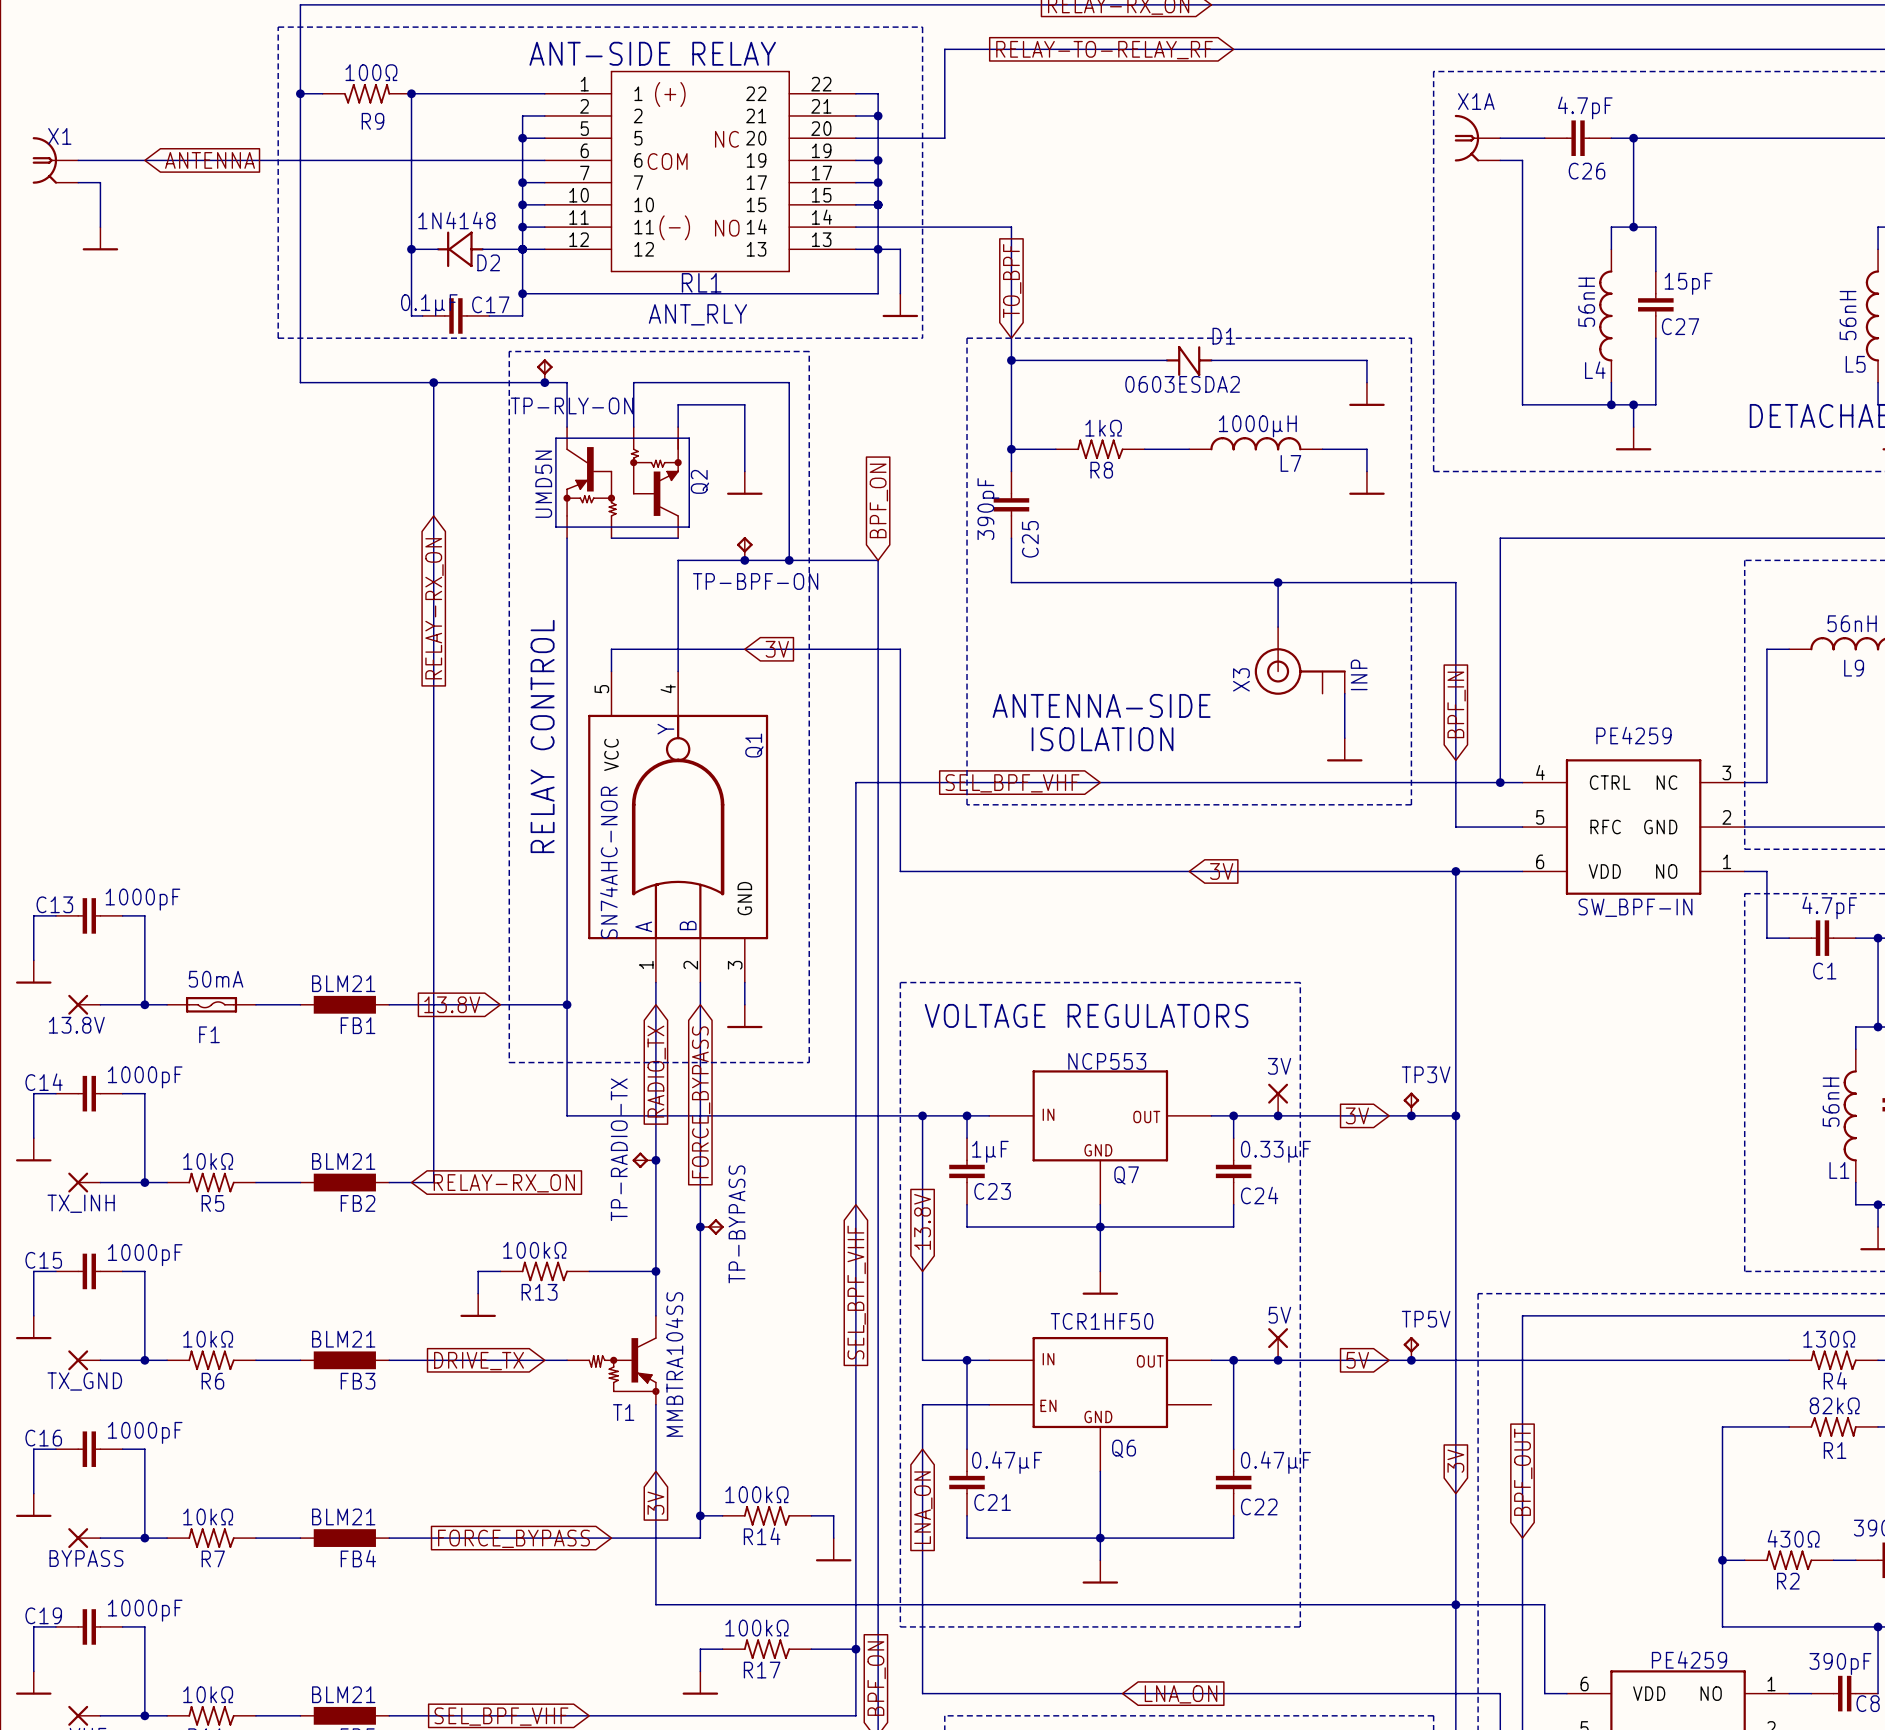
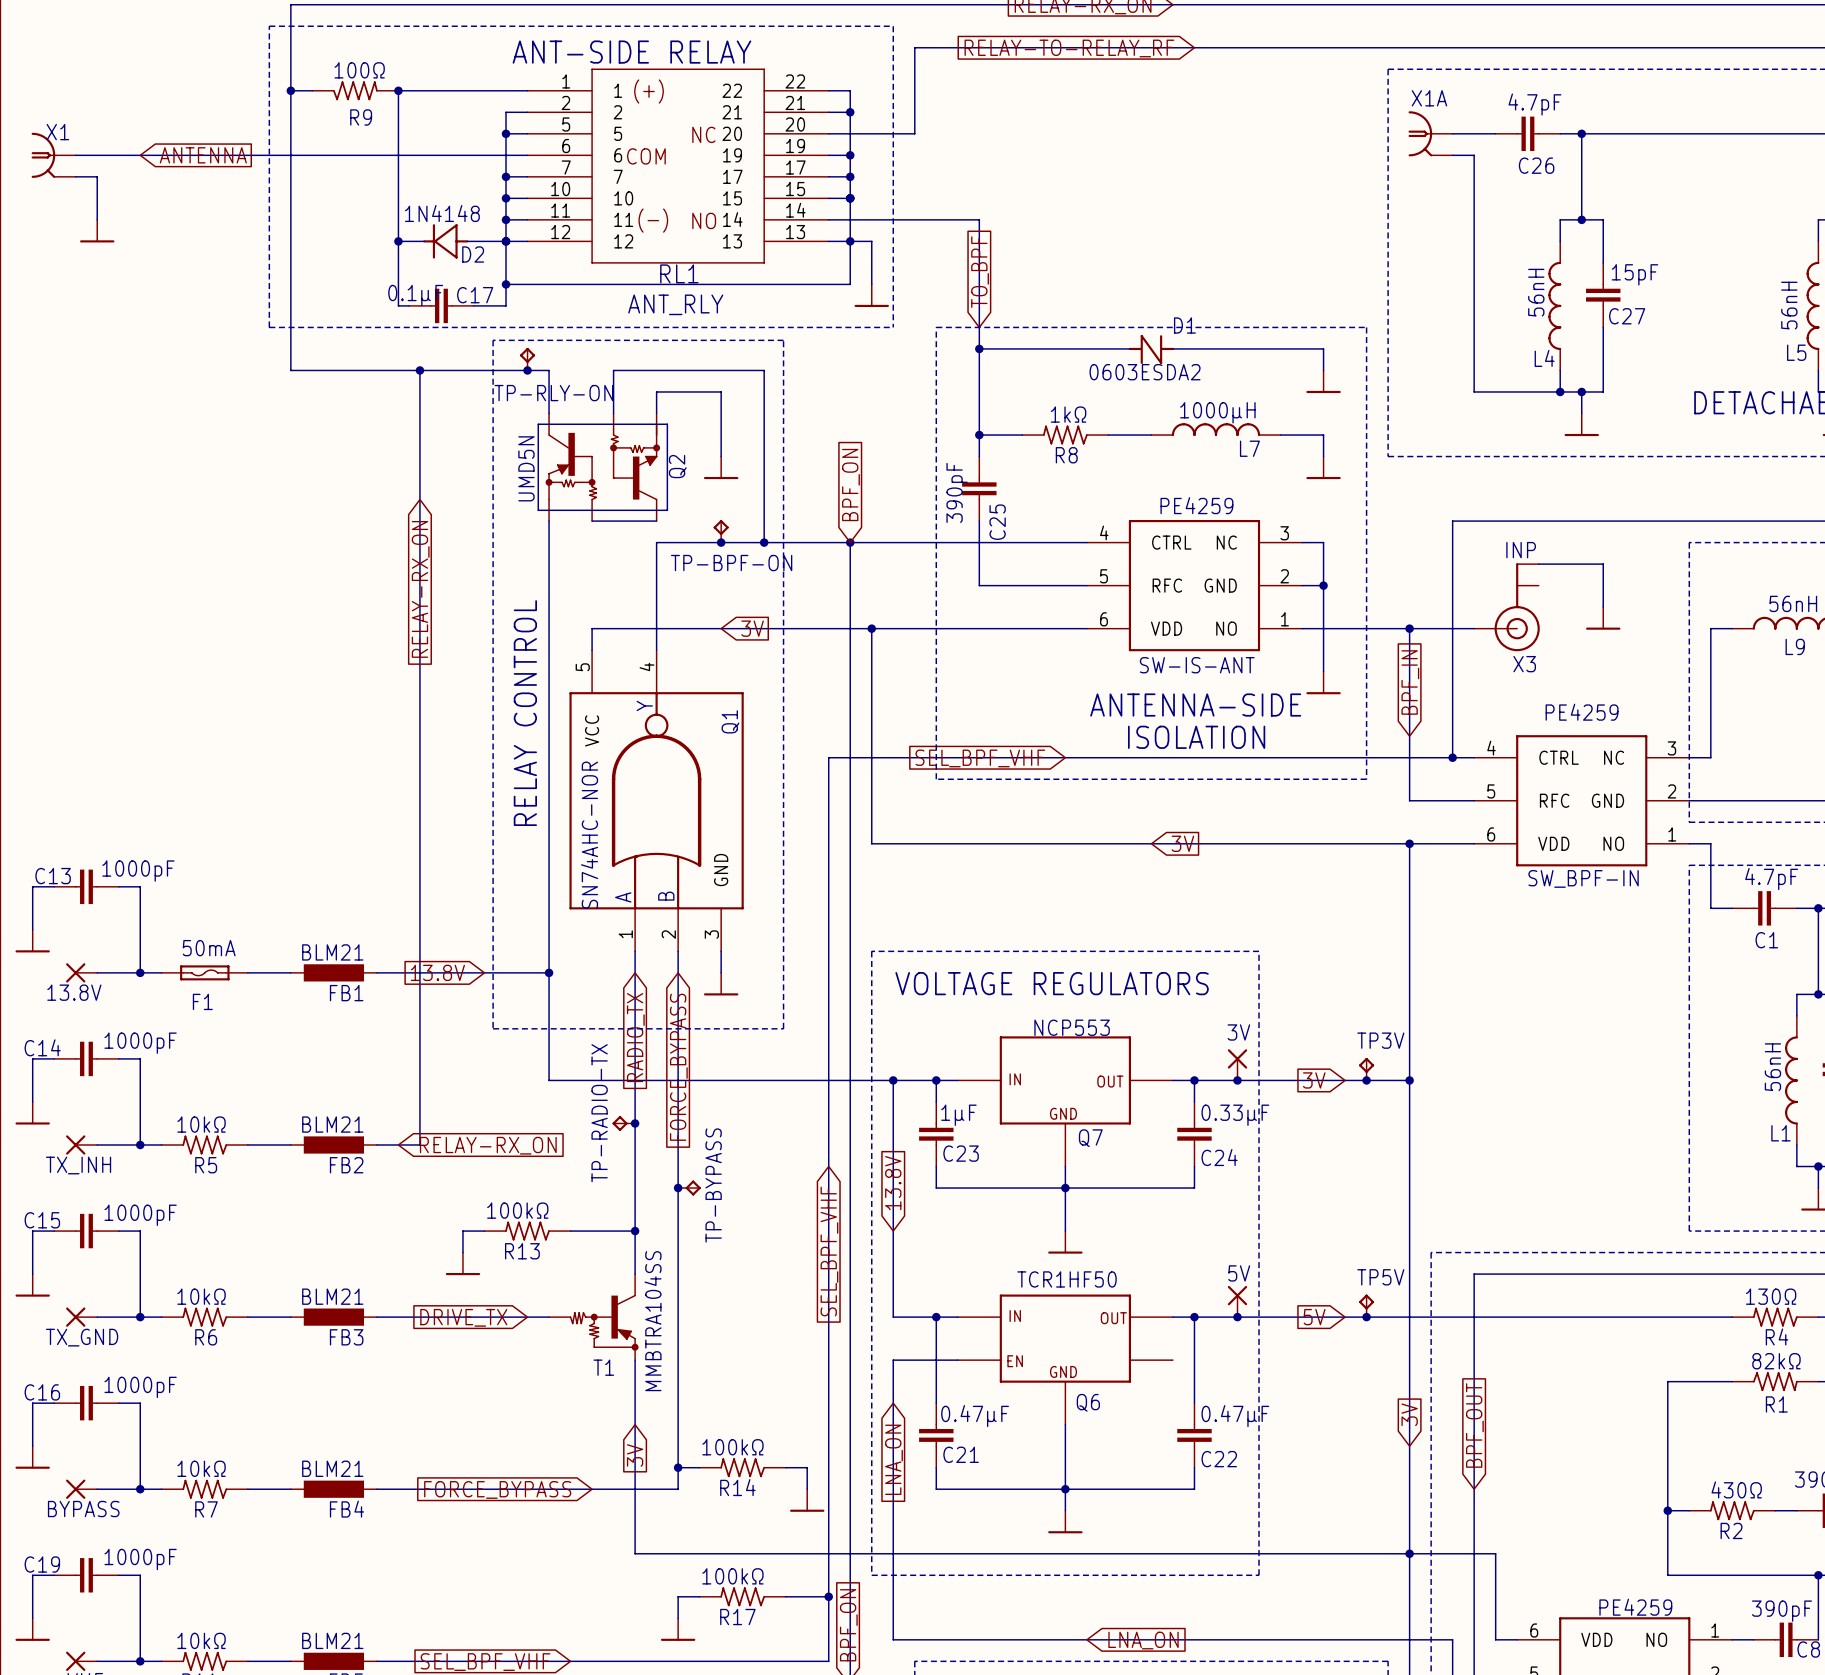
wire: none -> (850, 542) (1086, 542)
junction: none -> (850, 542)
wire: none -> (1302, 542) (1323, 542) (1323, 671)
wire: (1011, 582) (1455, 582) (1455, 649) -> (979, 564) (979, 585) (1086, 585)
wire: (1278, 582) (1278, 627) -> none
junction: (1278, 582) -> none
wire: none -> (1538, 564) (1603, 564) (1603, 607)
SW-IS-ANT: none -> PE4259 (1194, 585)
wire: none -> (1302, 585) (1323, 585)
junction: none -> (1323, 585)
power symbol: none -> (1603, 618)
wire: none -> (871, 628) (1086, 628)
junction: none -> (871, 628)
wire: none -> (1302, 628) (1474, 628)
junction: none -> (1409, 628)
X3 position: (1300, 660) -> (1506, 607)
X3 rotation: 0° (1300, 671) -> 90° counterclockwise (1517, 607)
wire: (1344, 693) (1344, 738) -> none
text position: ANTENNA-SIDE (1101, 705) -> ANTENNA-SIDE (1195, 705)
text position: ISOLATION (1102, 739) -> ISOLATION (1196, 737)
power symbol position: (1344, 749) -> (1323, 682)

